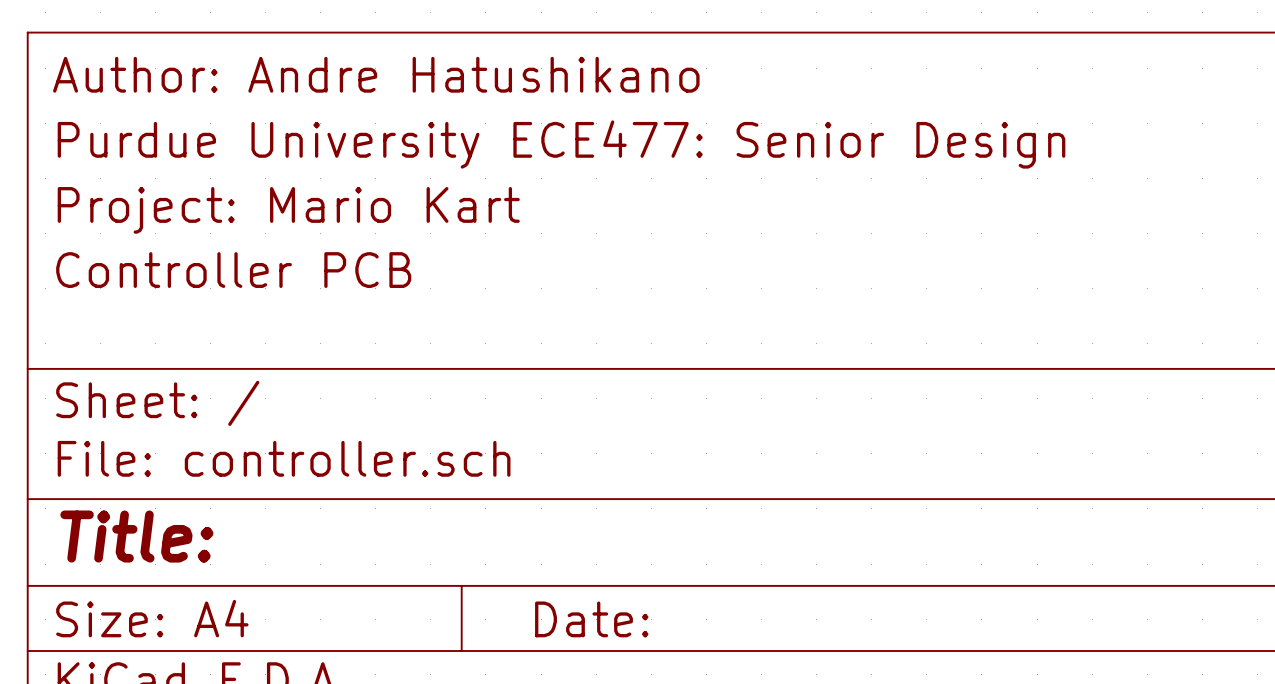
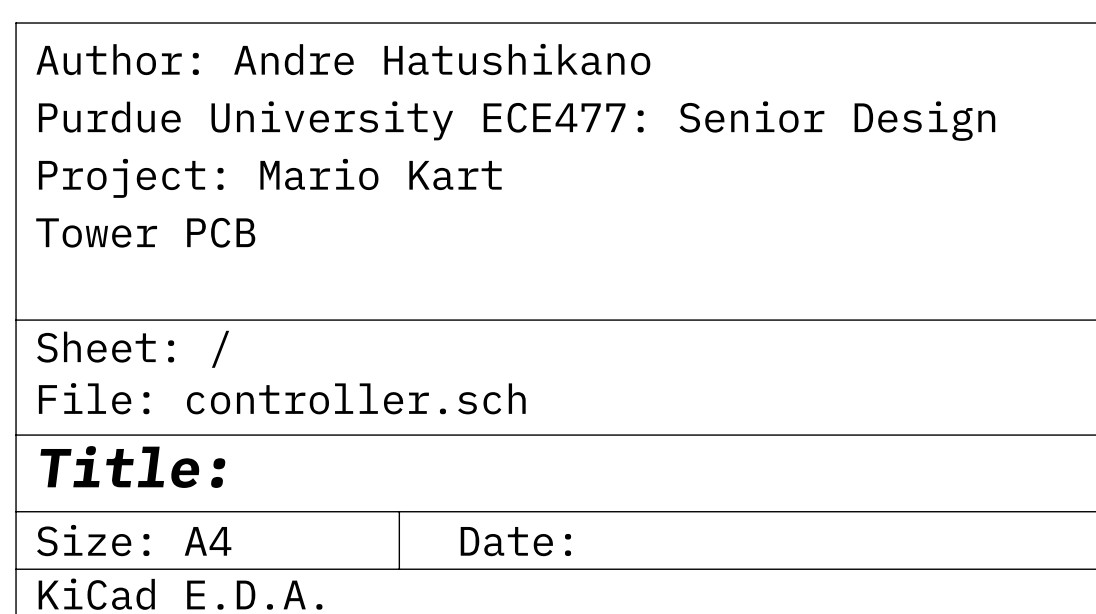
title block: Controller PCB (233, 270) -> Tower PCB (145, 232)

